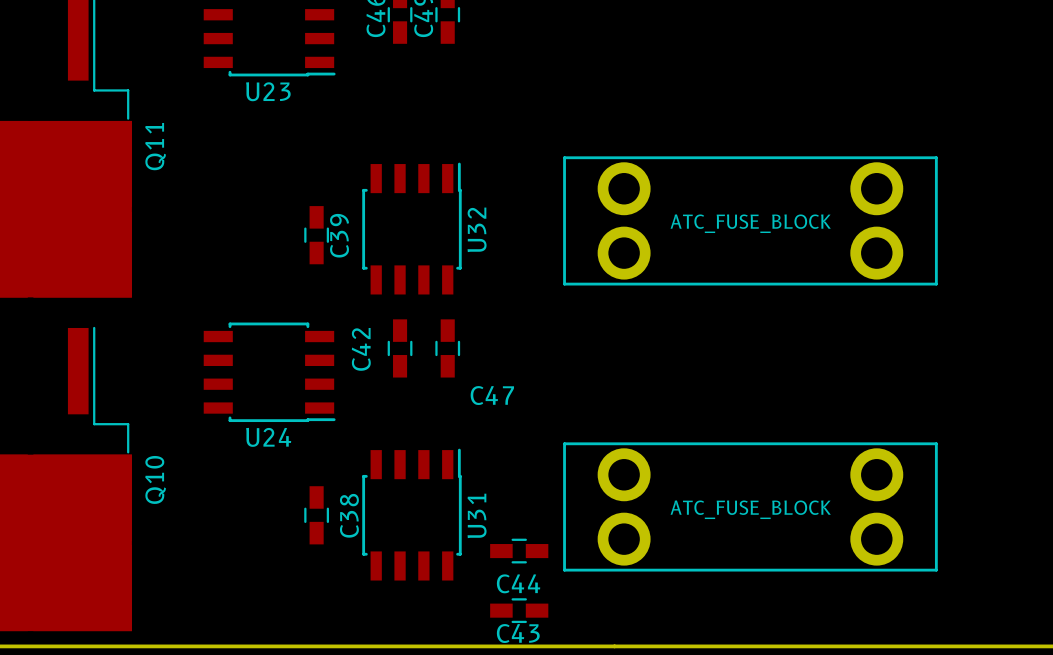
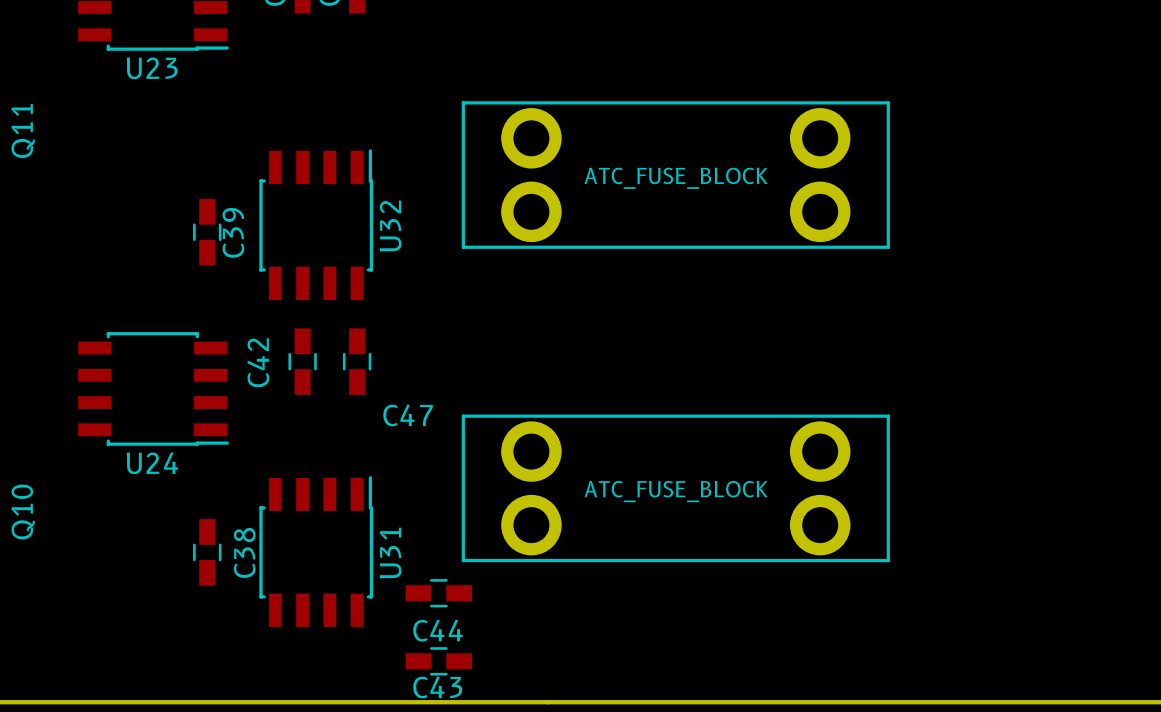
part position: (750, 220) -> (675, 175)
part position: (750, 506) -> (675, 488)

